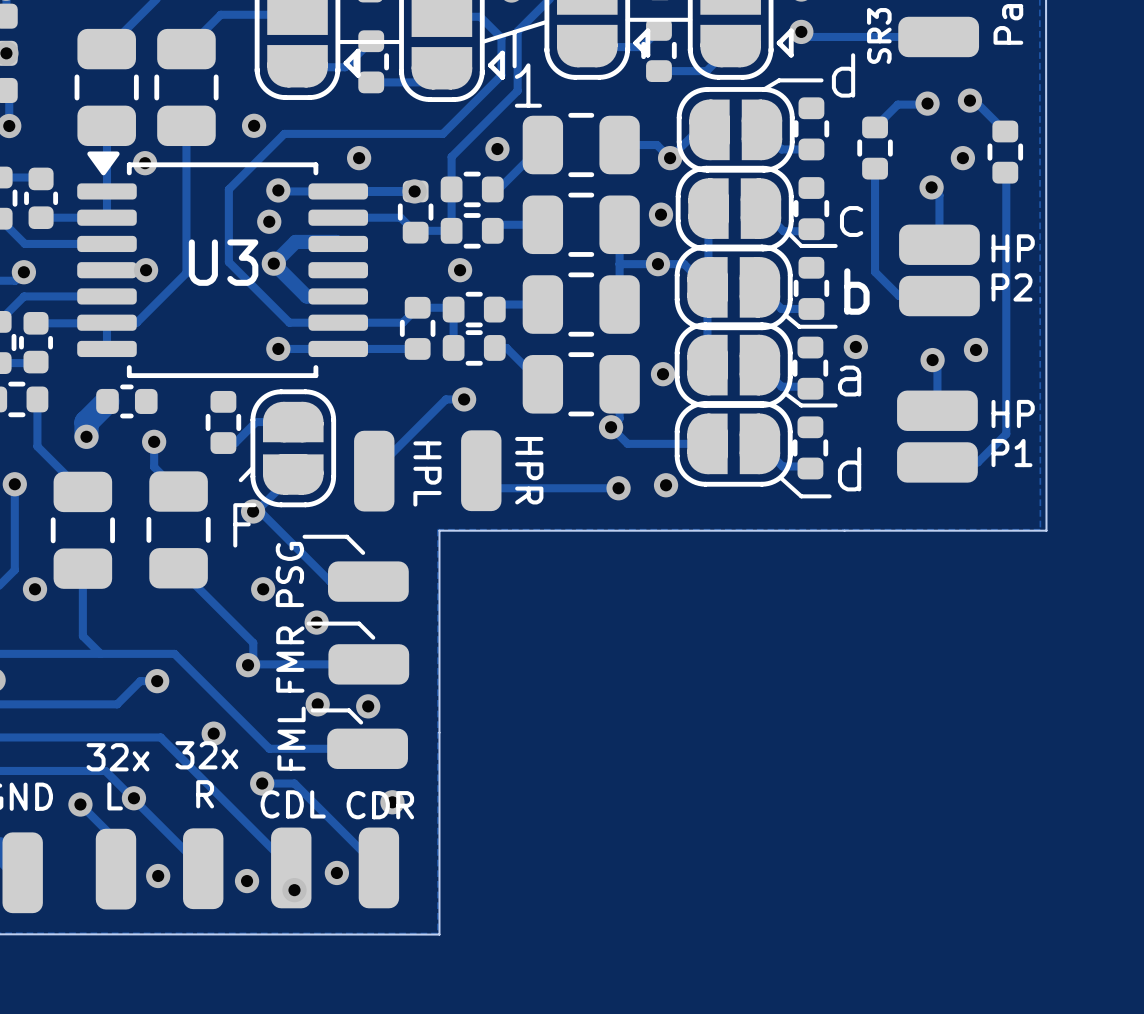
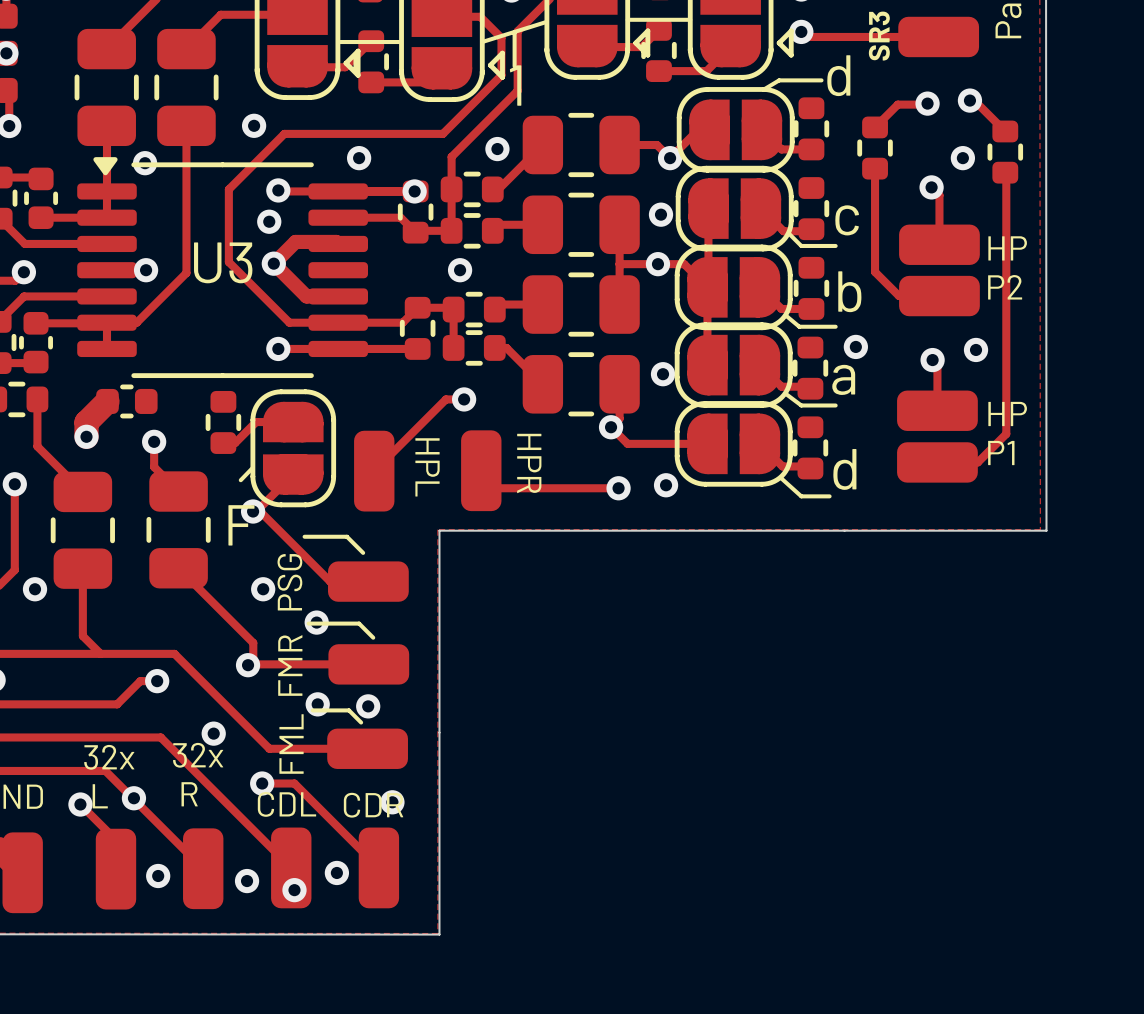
U3 footprint: [77, 151, 368, 379] -> [77, 157, 368, 379]

